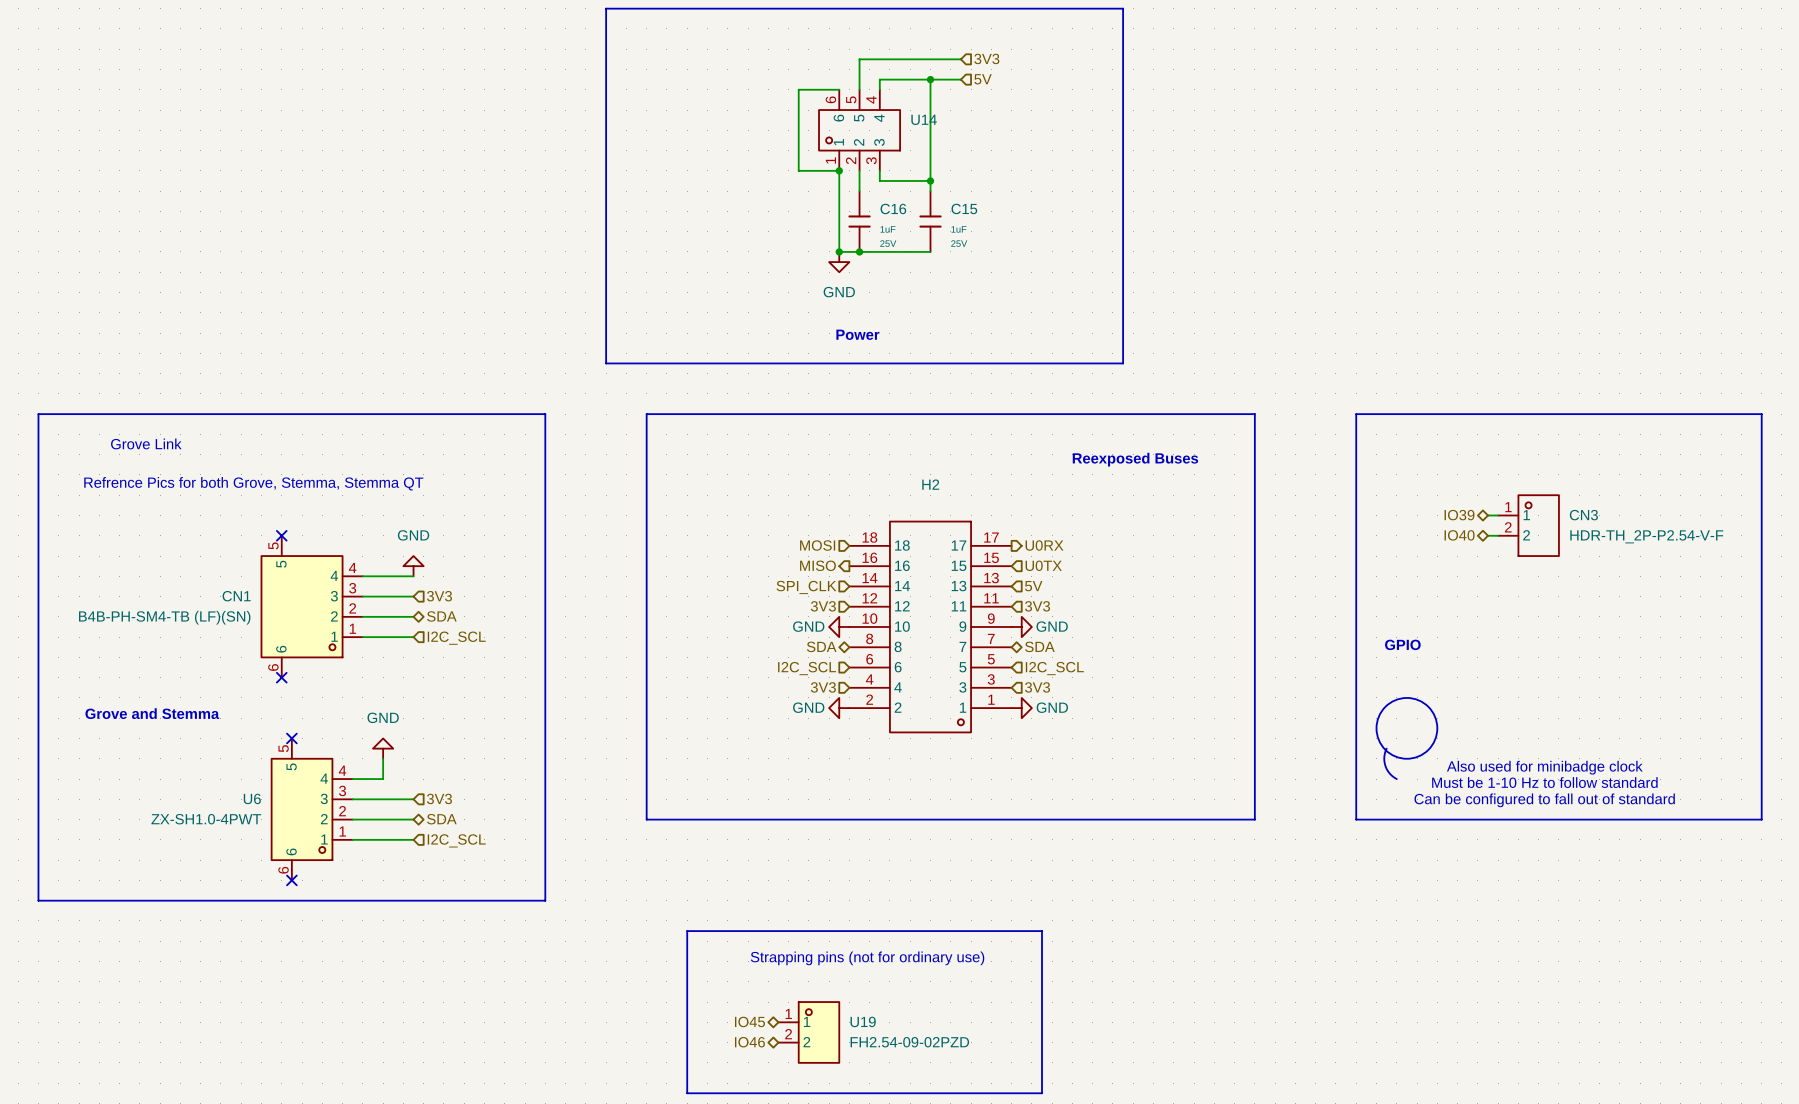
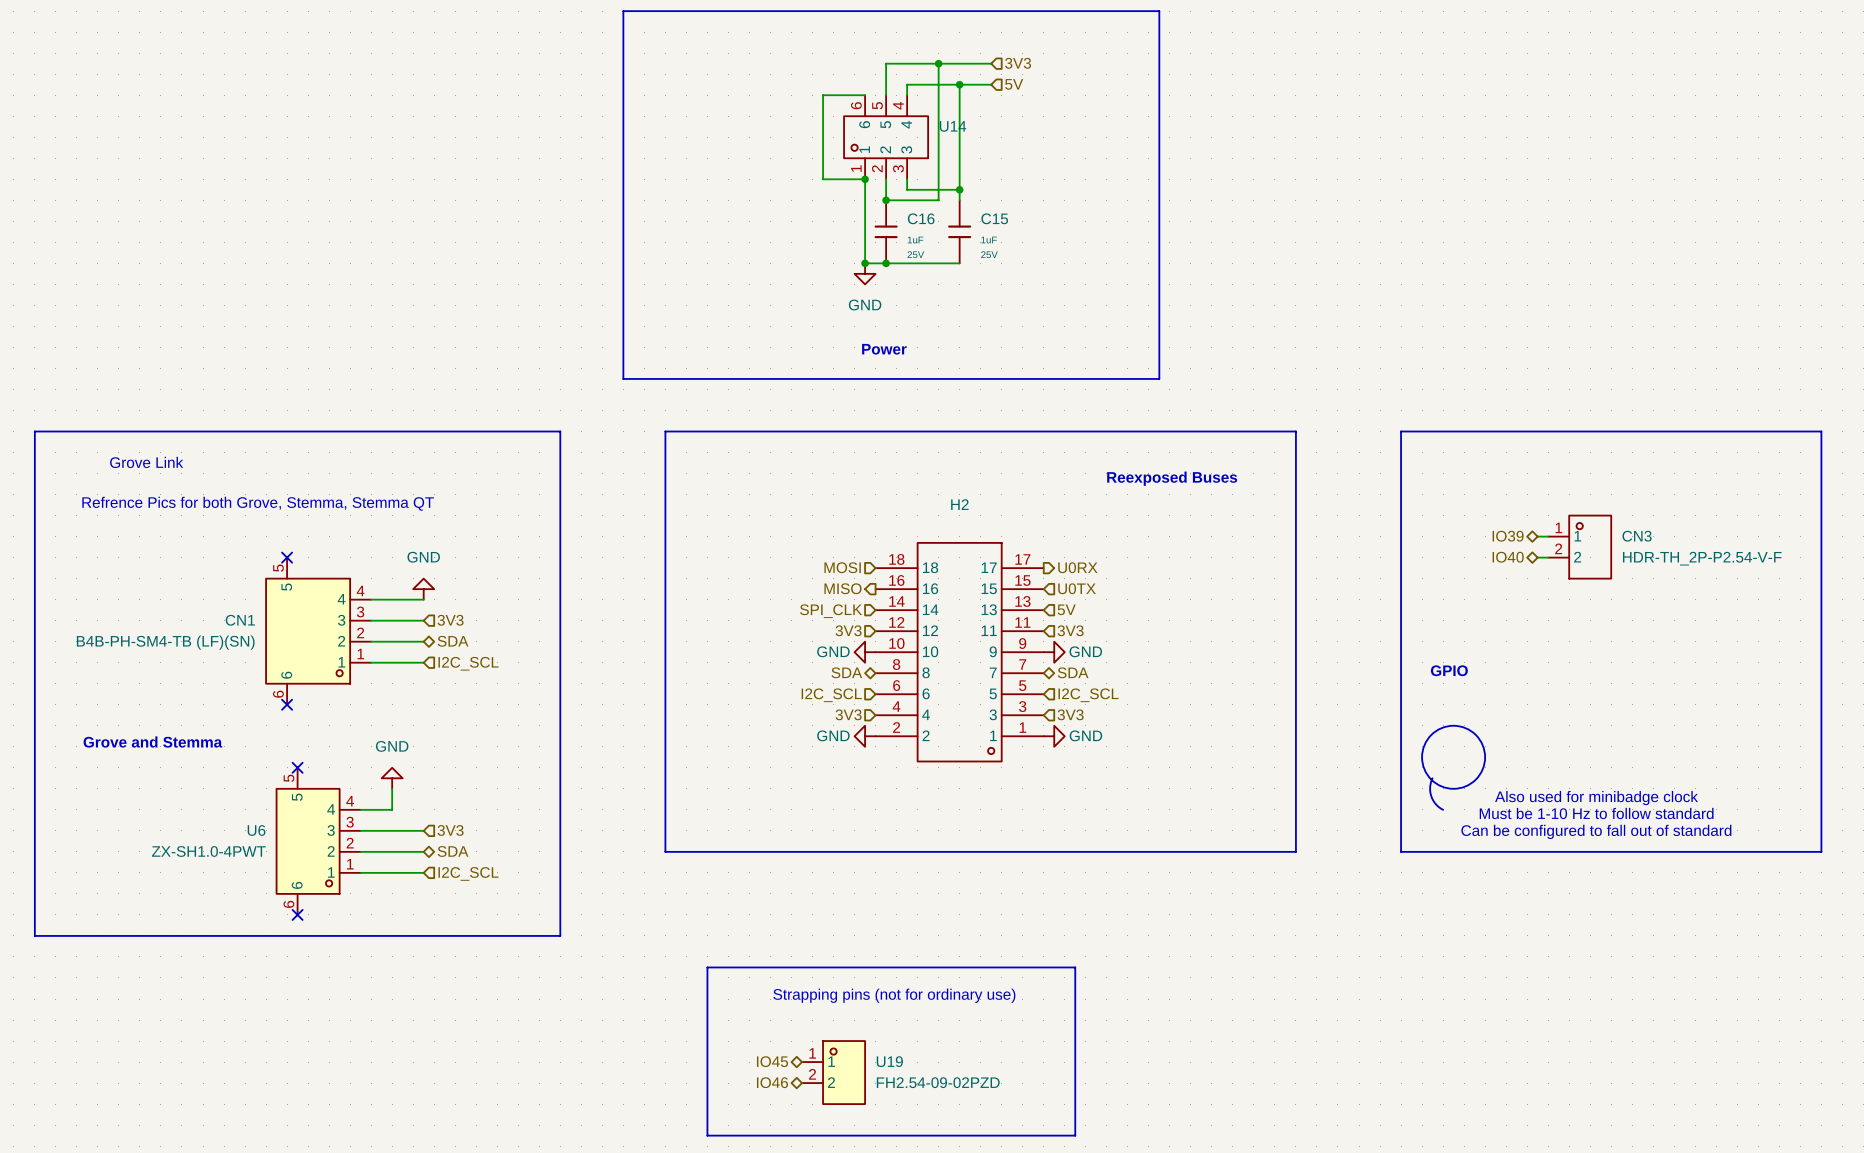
wire: none -> (938, 63) (938, 200) (886, 200)
junction: none -> (938, 63)
junction: none -> (886, 200)

